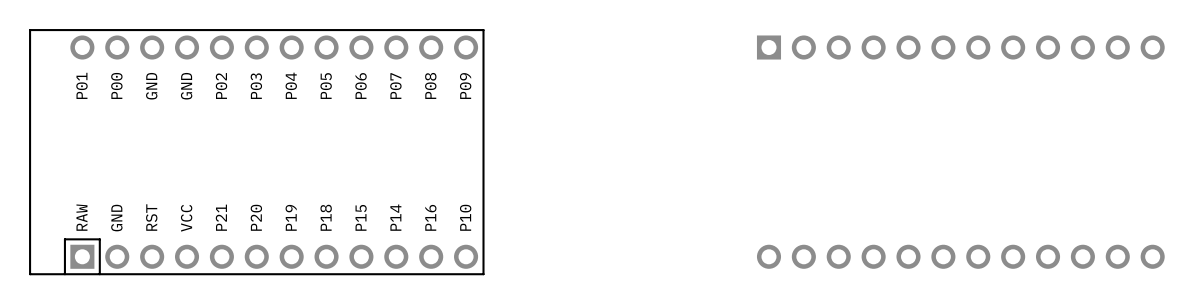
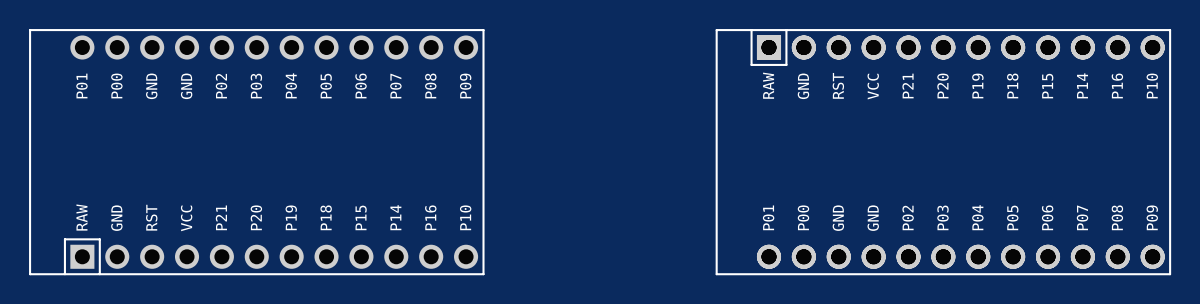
part: none -> (943, 152)

